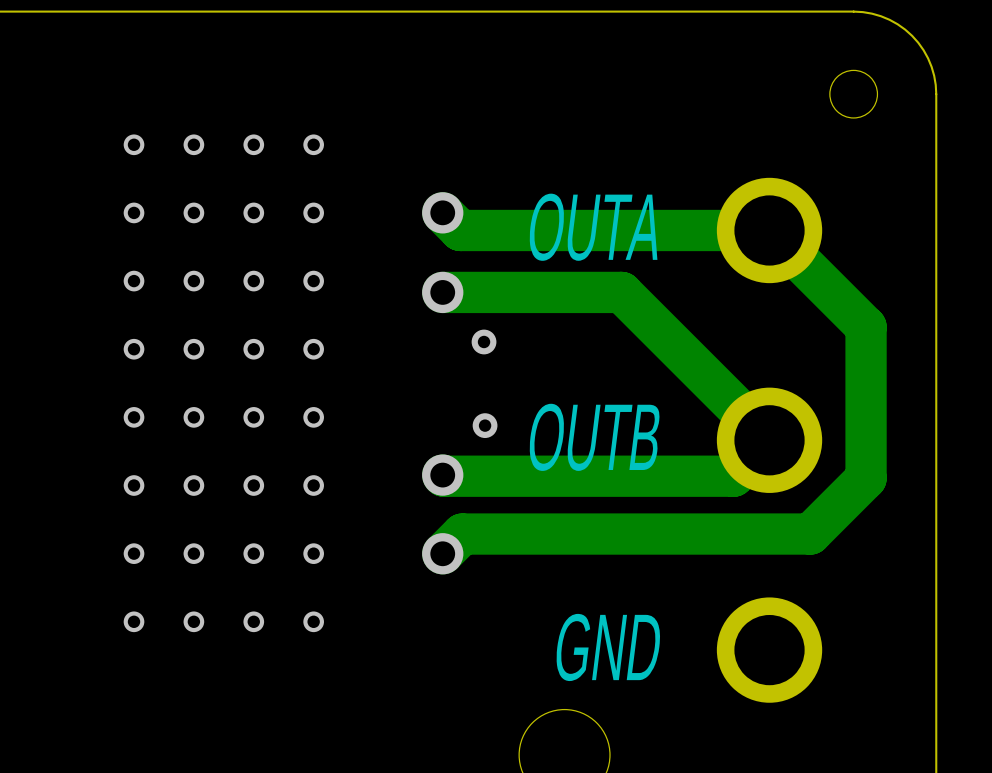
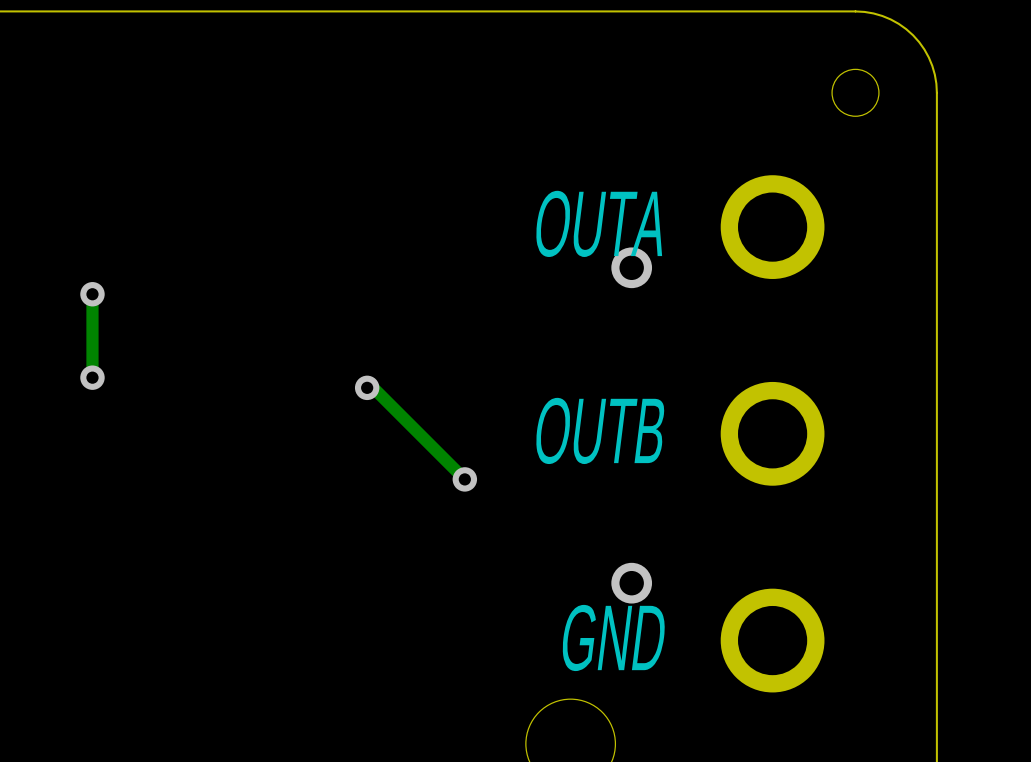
via: (134, 144) -> none
via: (193, 144) -> none
via: (253, 144) -> none
via: (313, 144) -> none
via: (134, 212) -> none
via: (193, 212) -> none
via: (253, 212) -> none
via: (313, 212) -> none
track: (442, 212) (460, 230) (769, 230) (866, 327) (866, 478) (810, 534) (462, 534) (442, 553) -> none
via: (442, 212) -> none
via: none -> (631, 267)
via: (134, 281) -> none
via: (193, 281) -> none
via: (253, 281) -> none
via: (313, 281) -> none
track: (442, 292) (621, 292) (769, 440) (733, 476) (442, 475) -> none
via: (442, 292) -> none
track: none -> (92, 294) (92, 377)
via: none -> (92, 294)
via: (484, 341) -> none
via: (134, 349) -> none
via: (193, 349) -> none
via: (253, 349) -> none
via: (313, 349) -> none
via: none -> (92, 377)
track: none -> (367, 387) (373, 387) (464, 479)
via: none -> (367, 387)
via: (134, 417) -> none
via: (193, 417) -> none
via: (253, 417) -> none
via: (313, 417) -> none
via: (485, 425) -> none
via size: [422, 454, 464, 496] -> [452, 467, 478, 492]
via: (134, 485) -> none
via: (193, 485) -> none
via: (253, 485) -> none
via: (313, 485) -> none
via: (134, 553) -> none
via: (193, 553) -> none
via: (253, 553) -> none
via: (313, 553) -> none
via: (442, 553) -> none
via: none -> (631, 583)
via: (134, 621) -> none
via: (193, 621) -> none
via: (253, 621) -> none
via: (313, 621) -> none

